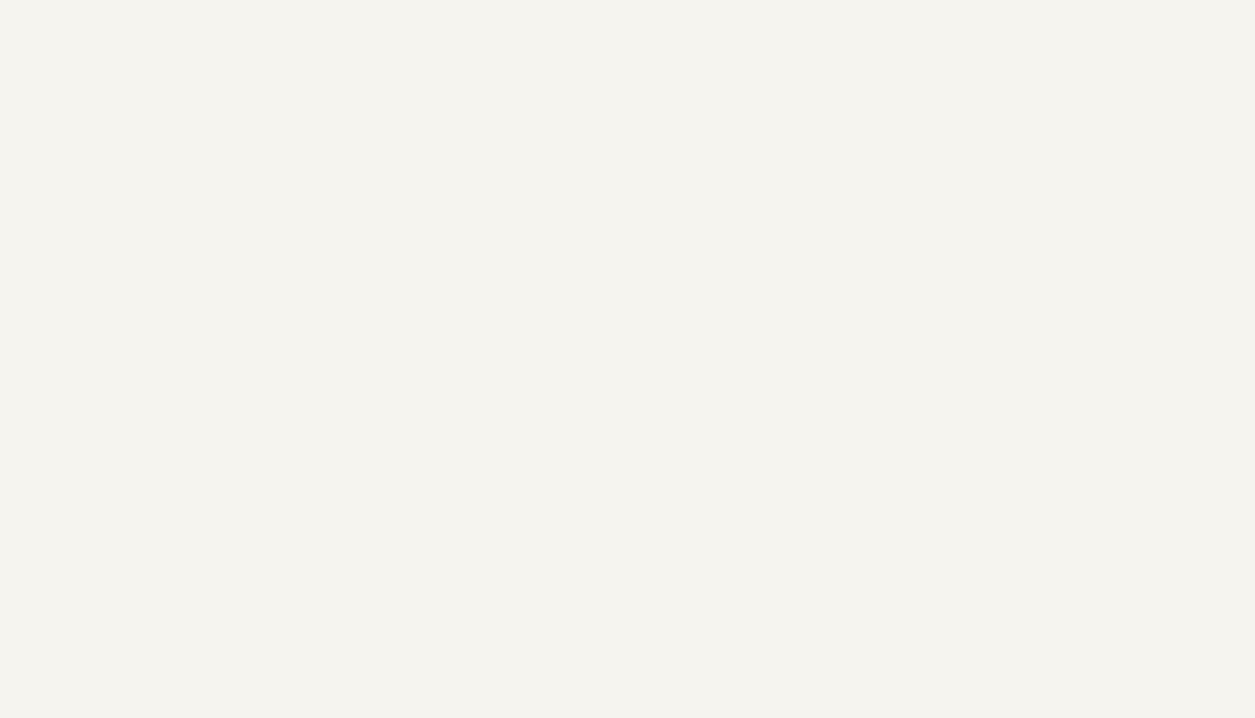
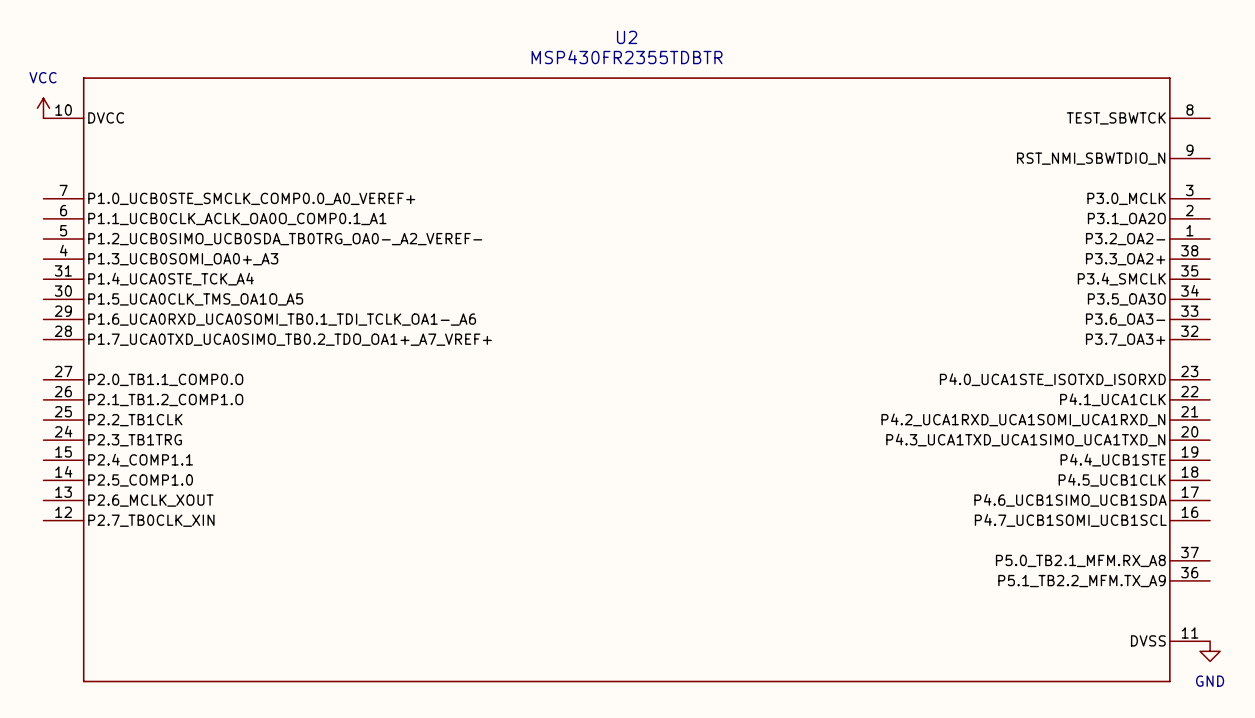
power symbol: none -> VCC (43, 108)
U2: none -> MSP430FR2355TDBTR (626, 379)
power symbol: none -> GND (1210, 651)

